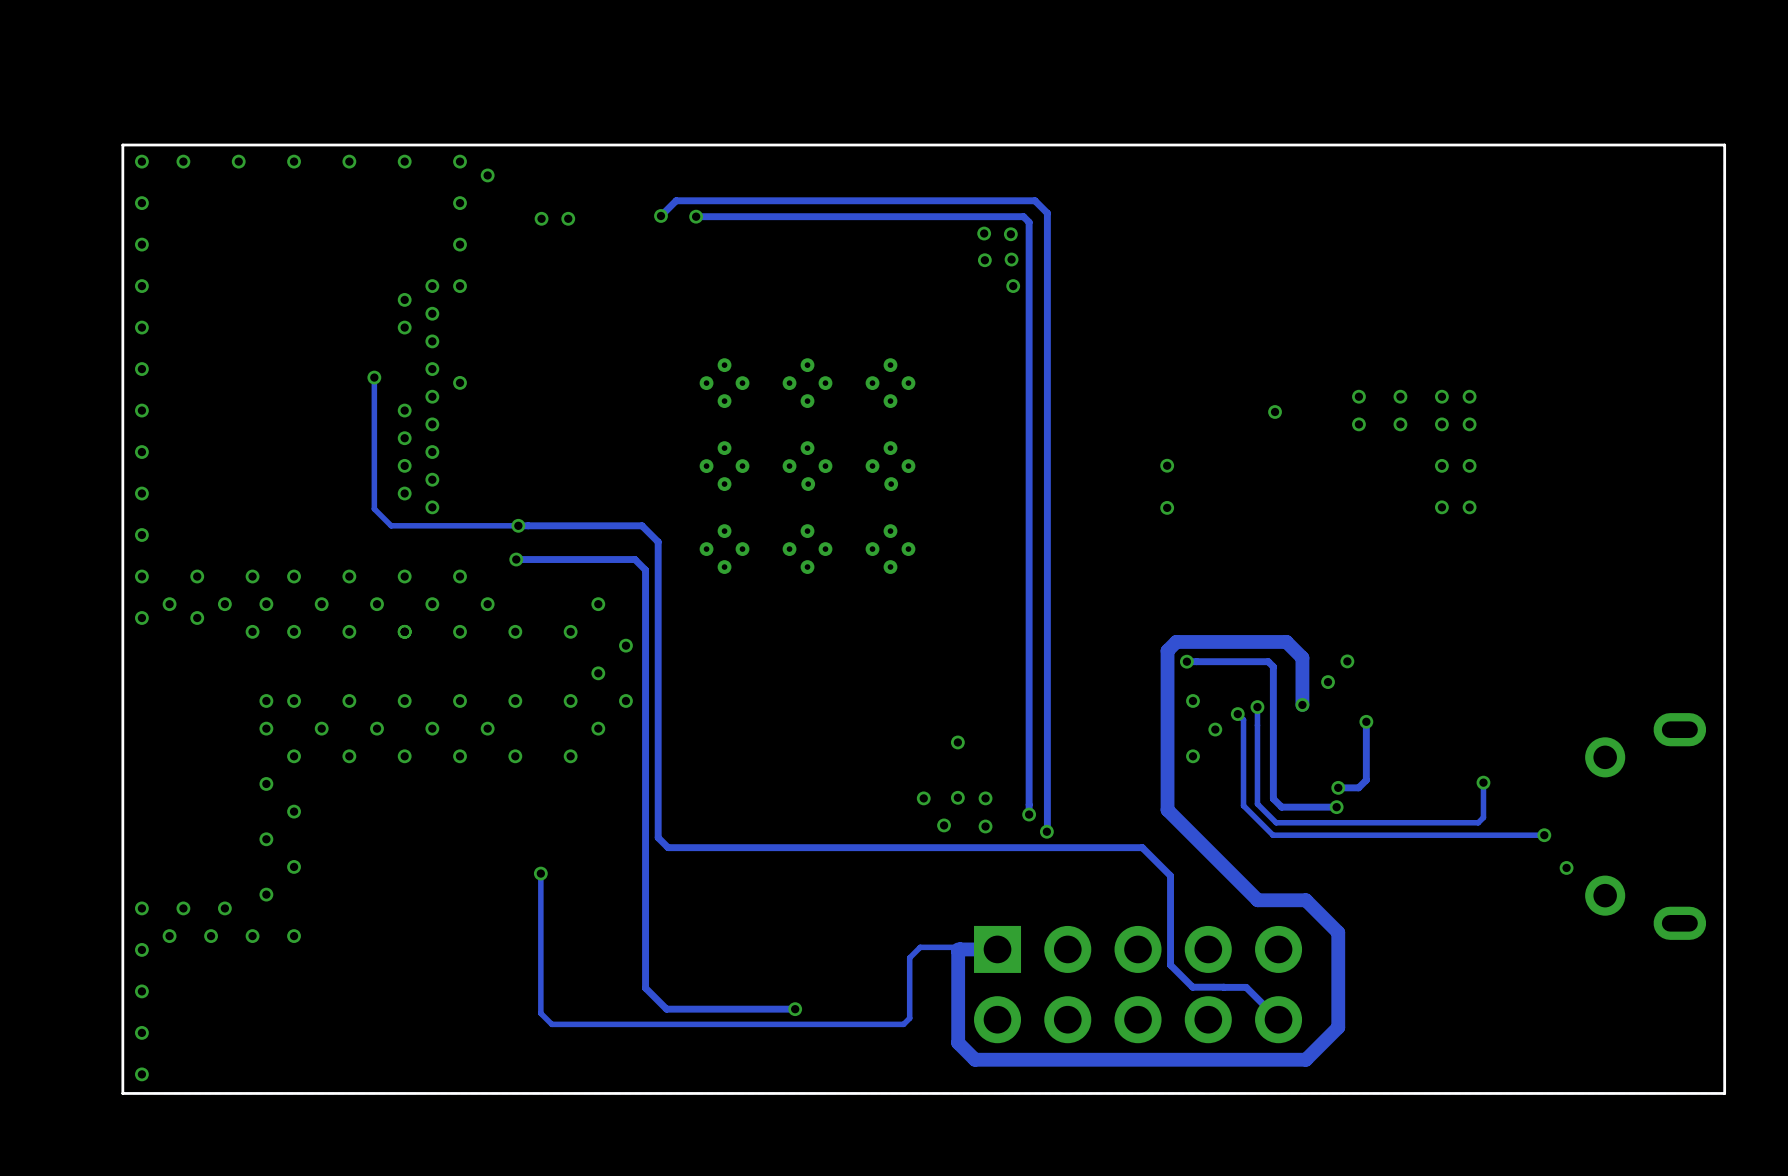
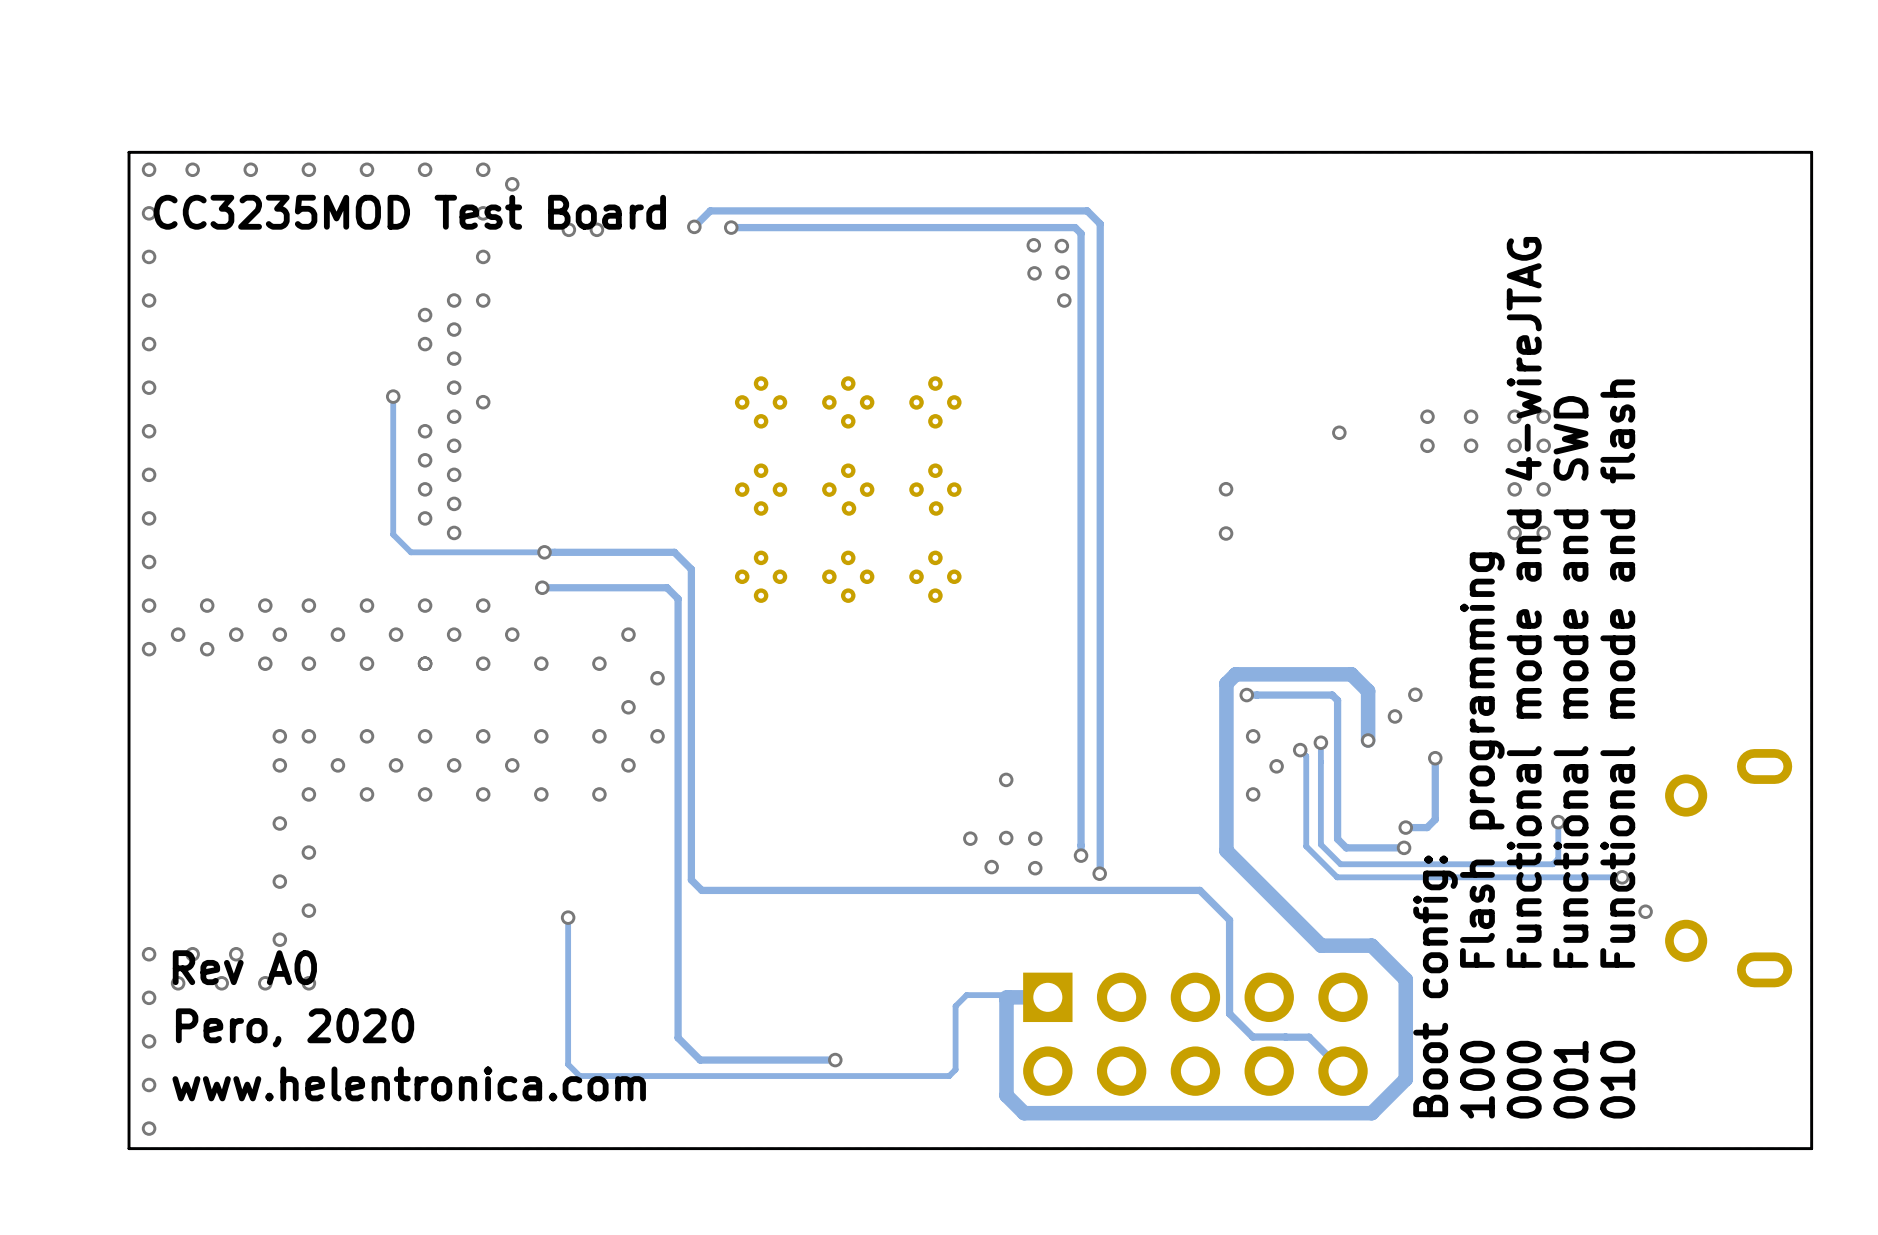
text: none -> CC3235MOD Test Board (409, 212)
text: none -> 000 Functional mode and 4-wireJTAG (1523, 677)
text: none -> 010 Functional mode and flash (1617, 749)
text: none -> 001 Functional mode and SWD (1571, 757)
text: none -> 100 Flash programming (1482, 835)
text: none -> Rev A0 (244, 967)
text: none -> Boot config: (1435, 986)
text: none -> Pero, 2020 (295, 1027)
text: none -> www.helentronica.com (409, 1083)

